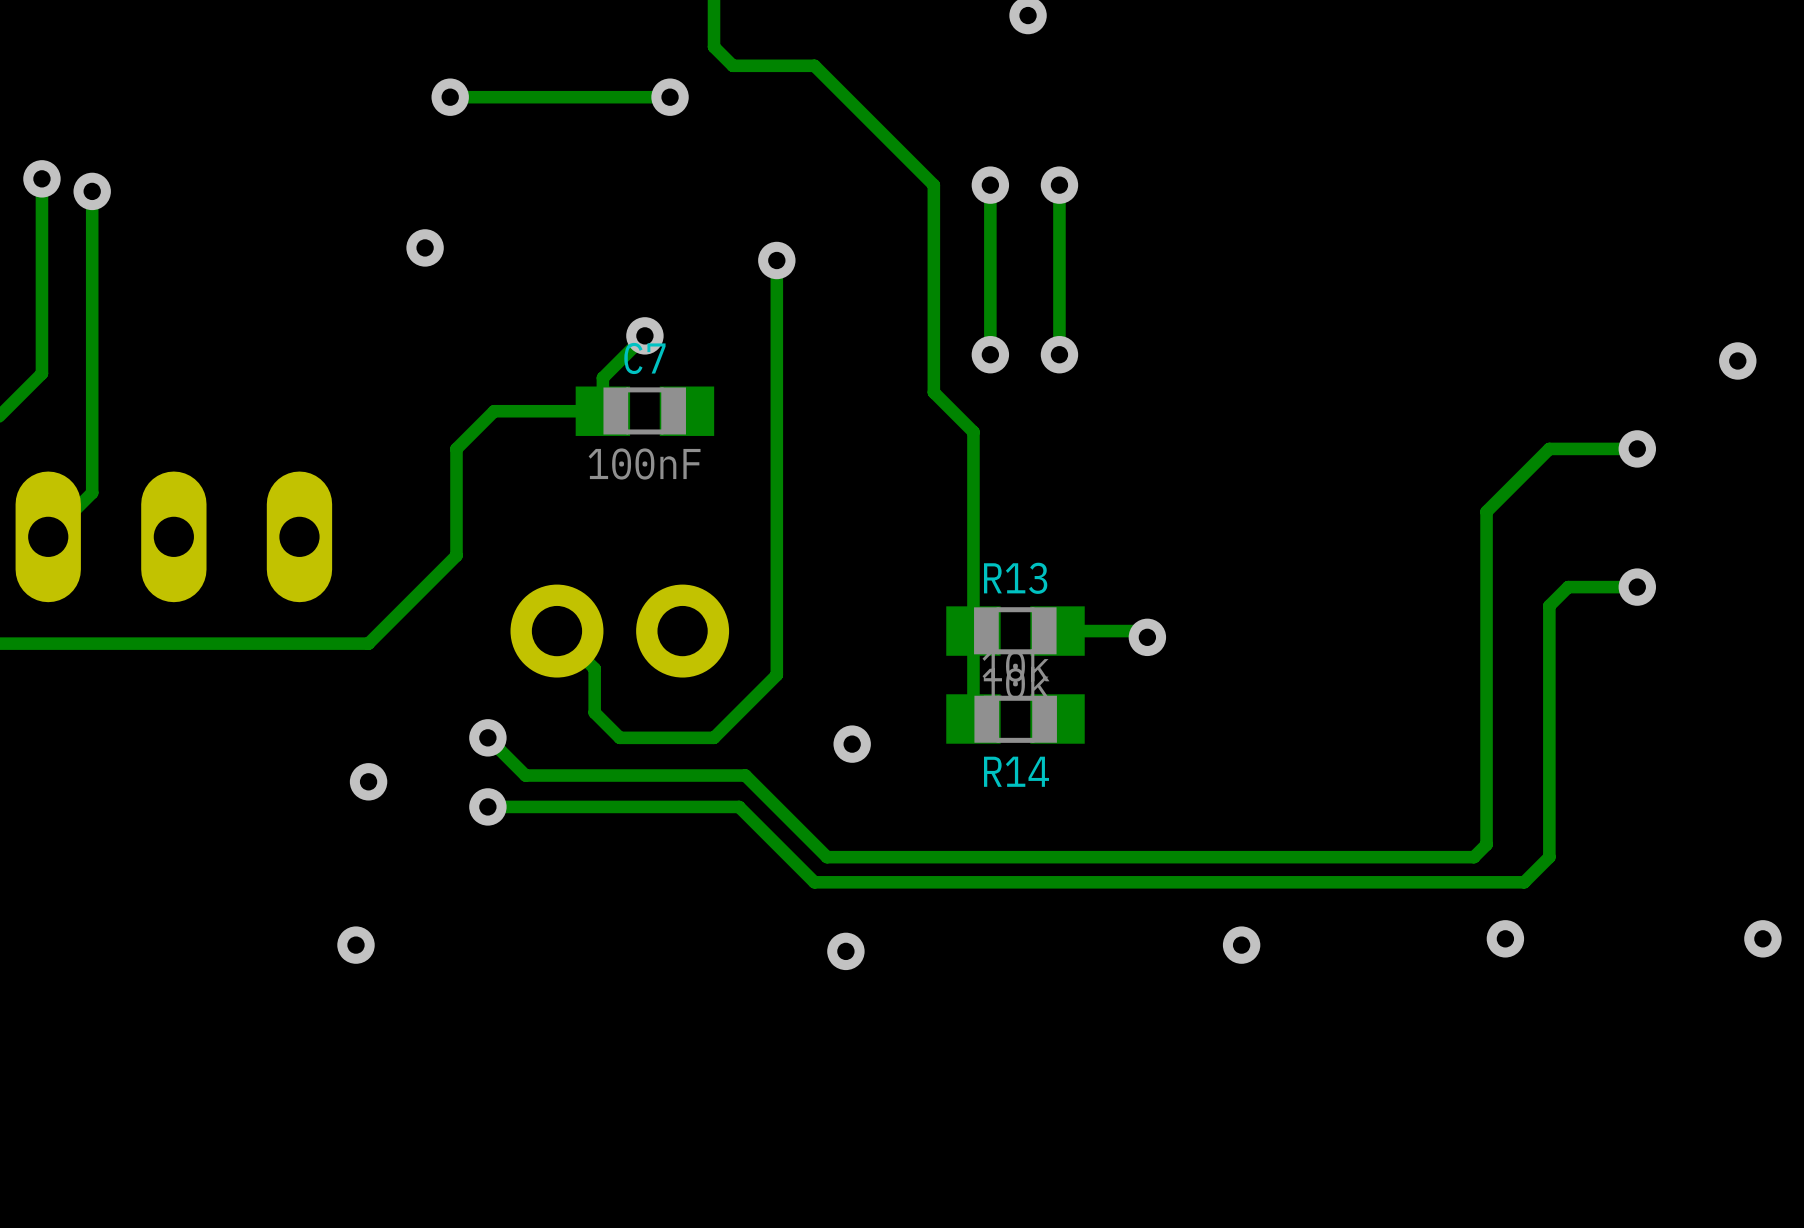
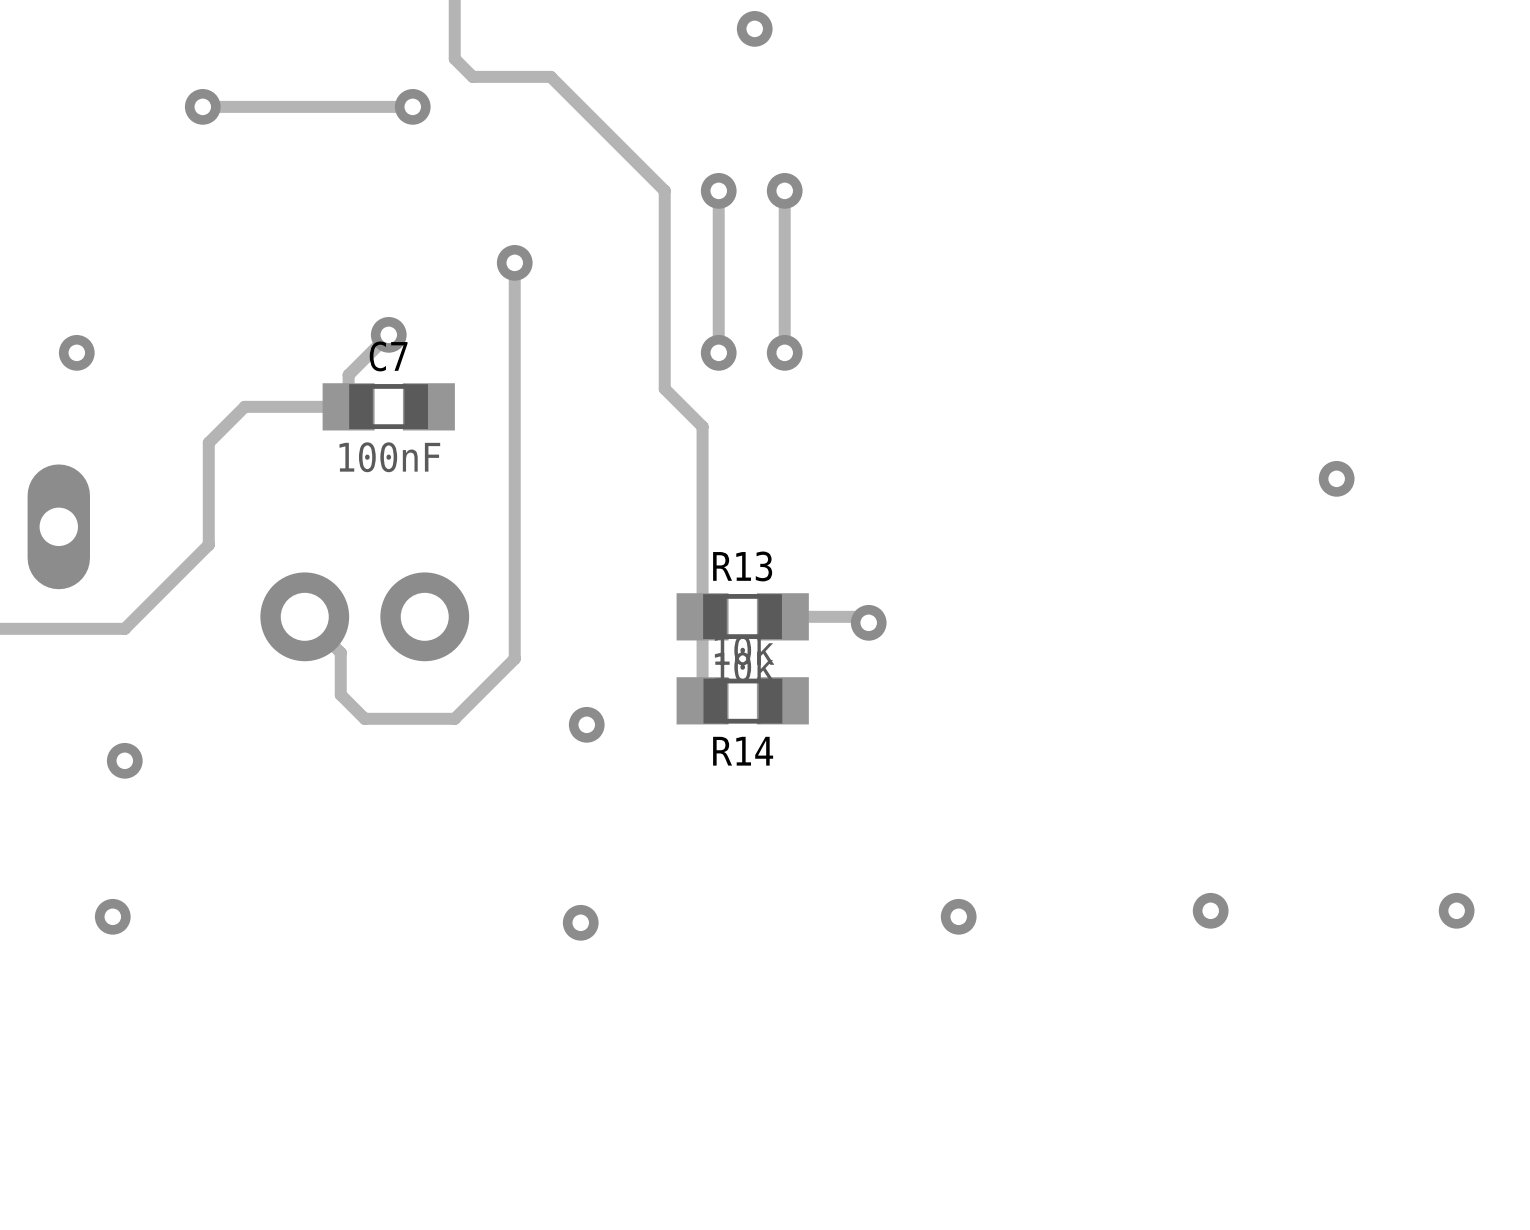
via position: (425, 247) -> (76, 352)
via: (1737, 360) -> none
track: (1637, 448) (1549, 448) (1486, 511) (1486, 844) (1473, 857) (827, 857) (745, 775) (525, 775) (487, 737) -> none
via position: (1637, 448) -> (1336, 478)
track: (1637, 587) (1568, 587) (1549, 605) (1549, 857) (1524, 882) (814, 882) (739, 806) (487, 806) -> none
via: (1637, 587) -> none
via: (487, 737) -> none
via: (487, 806) -> none

